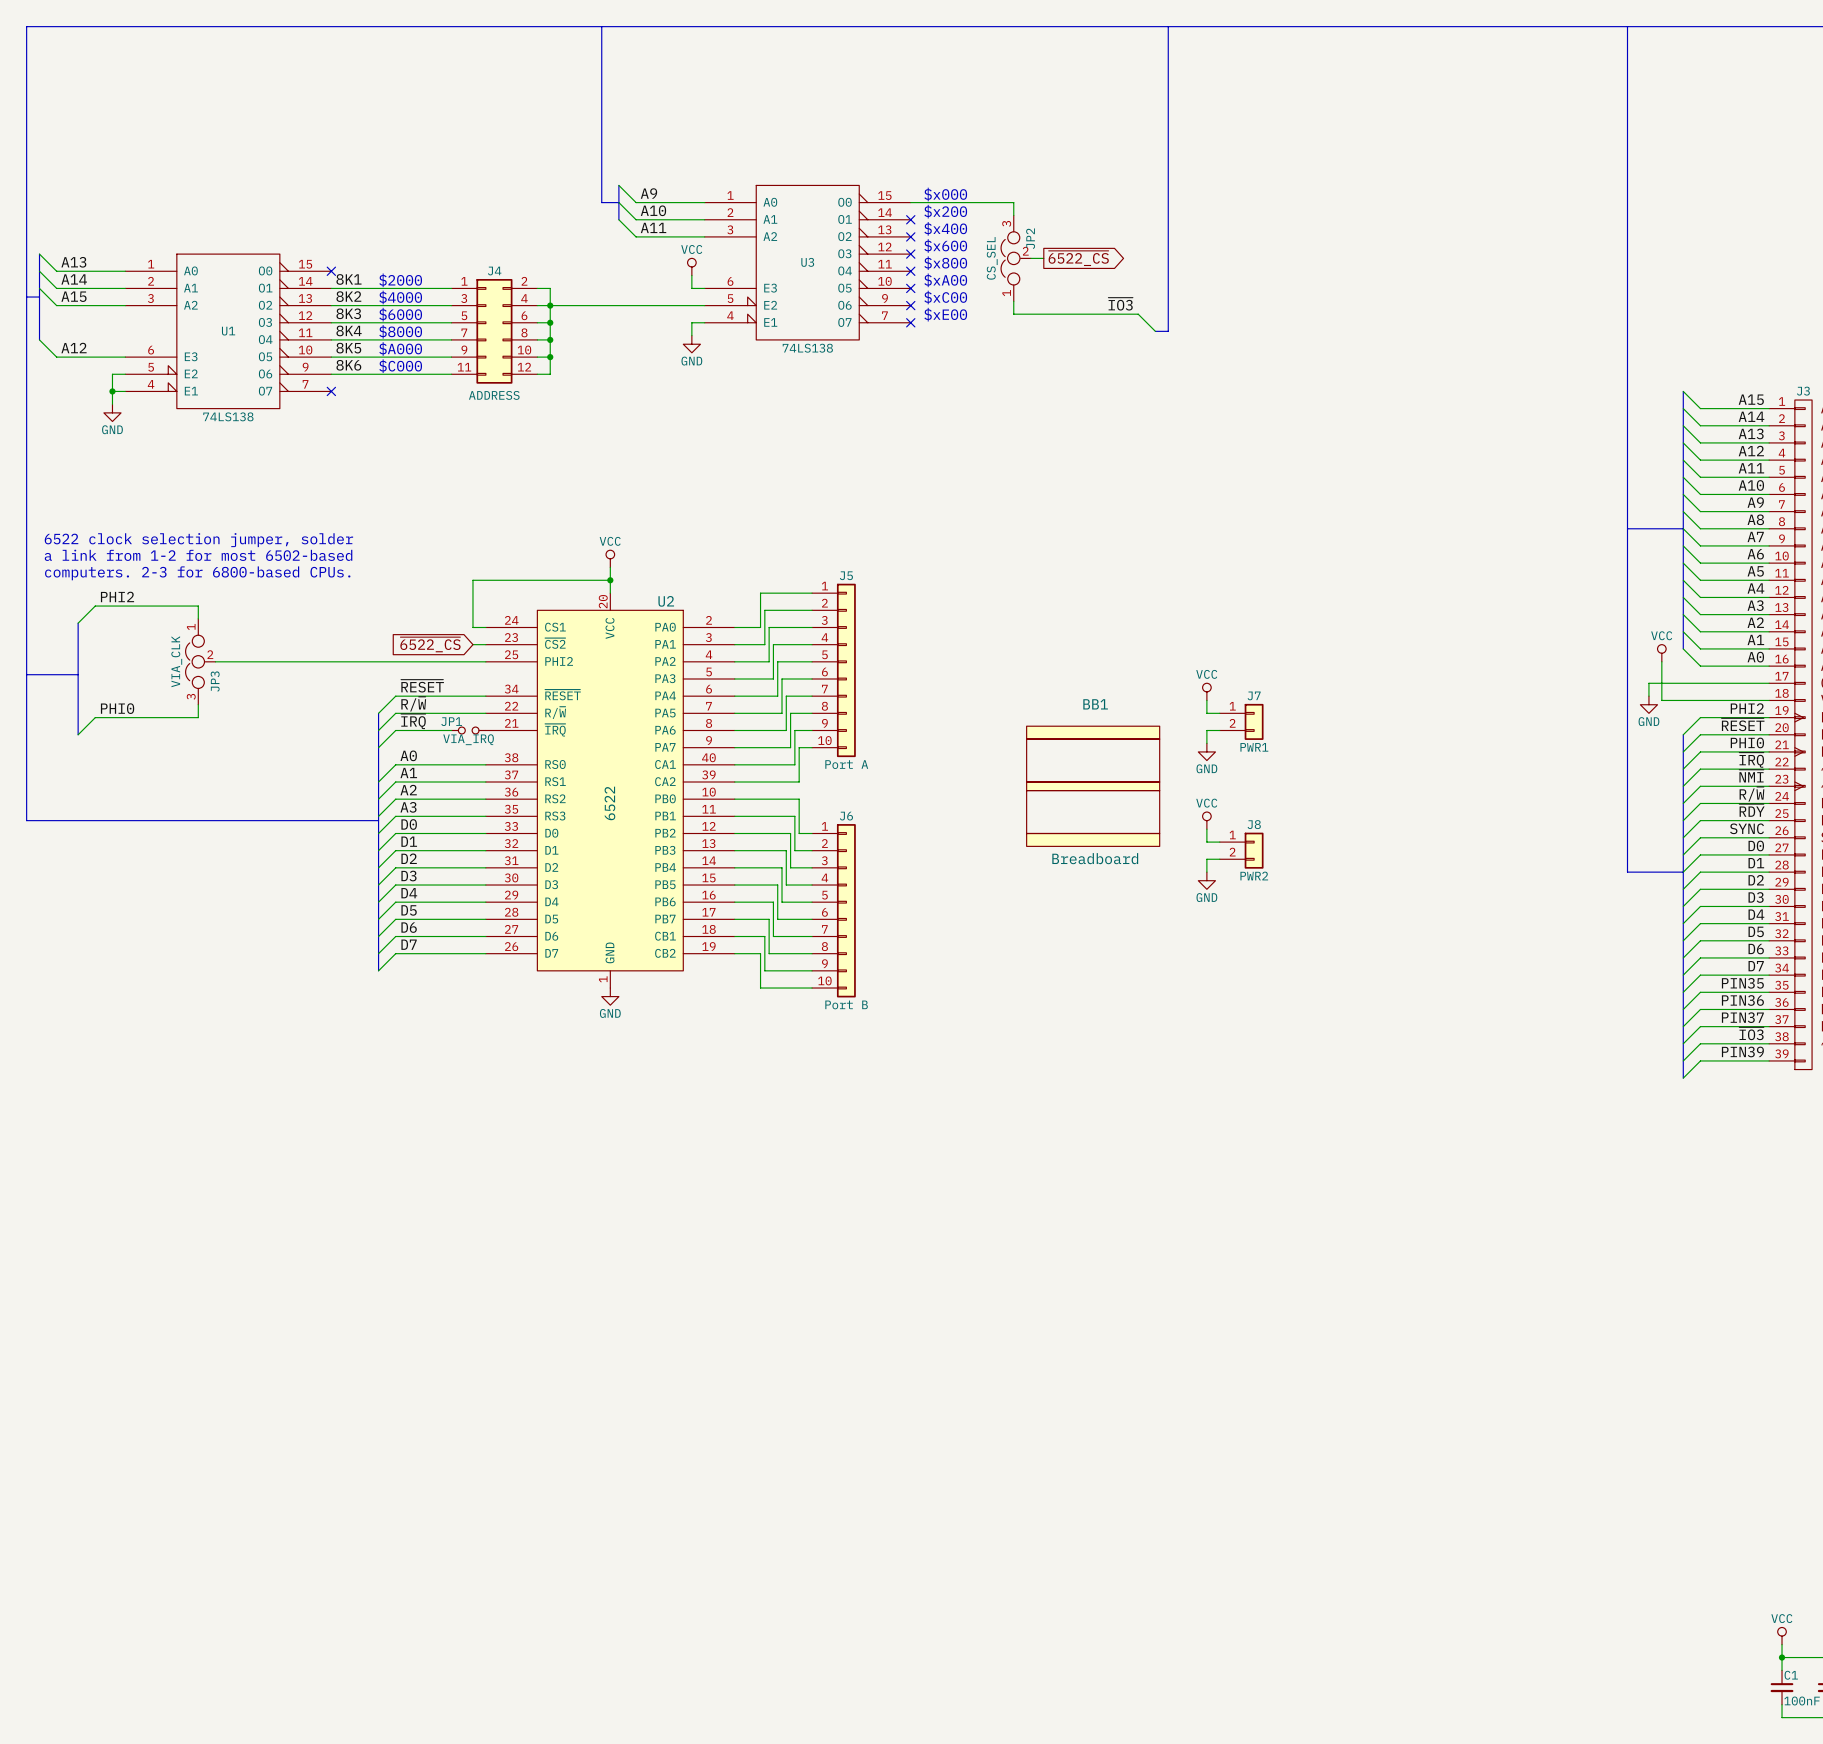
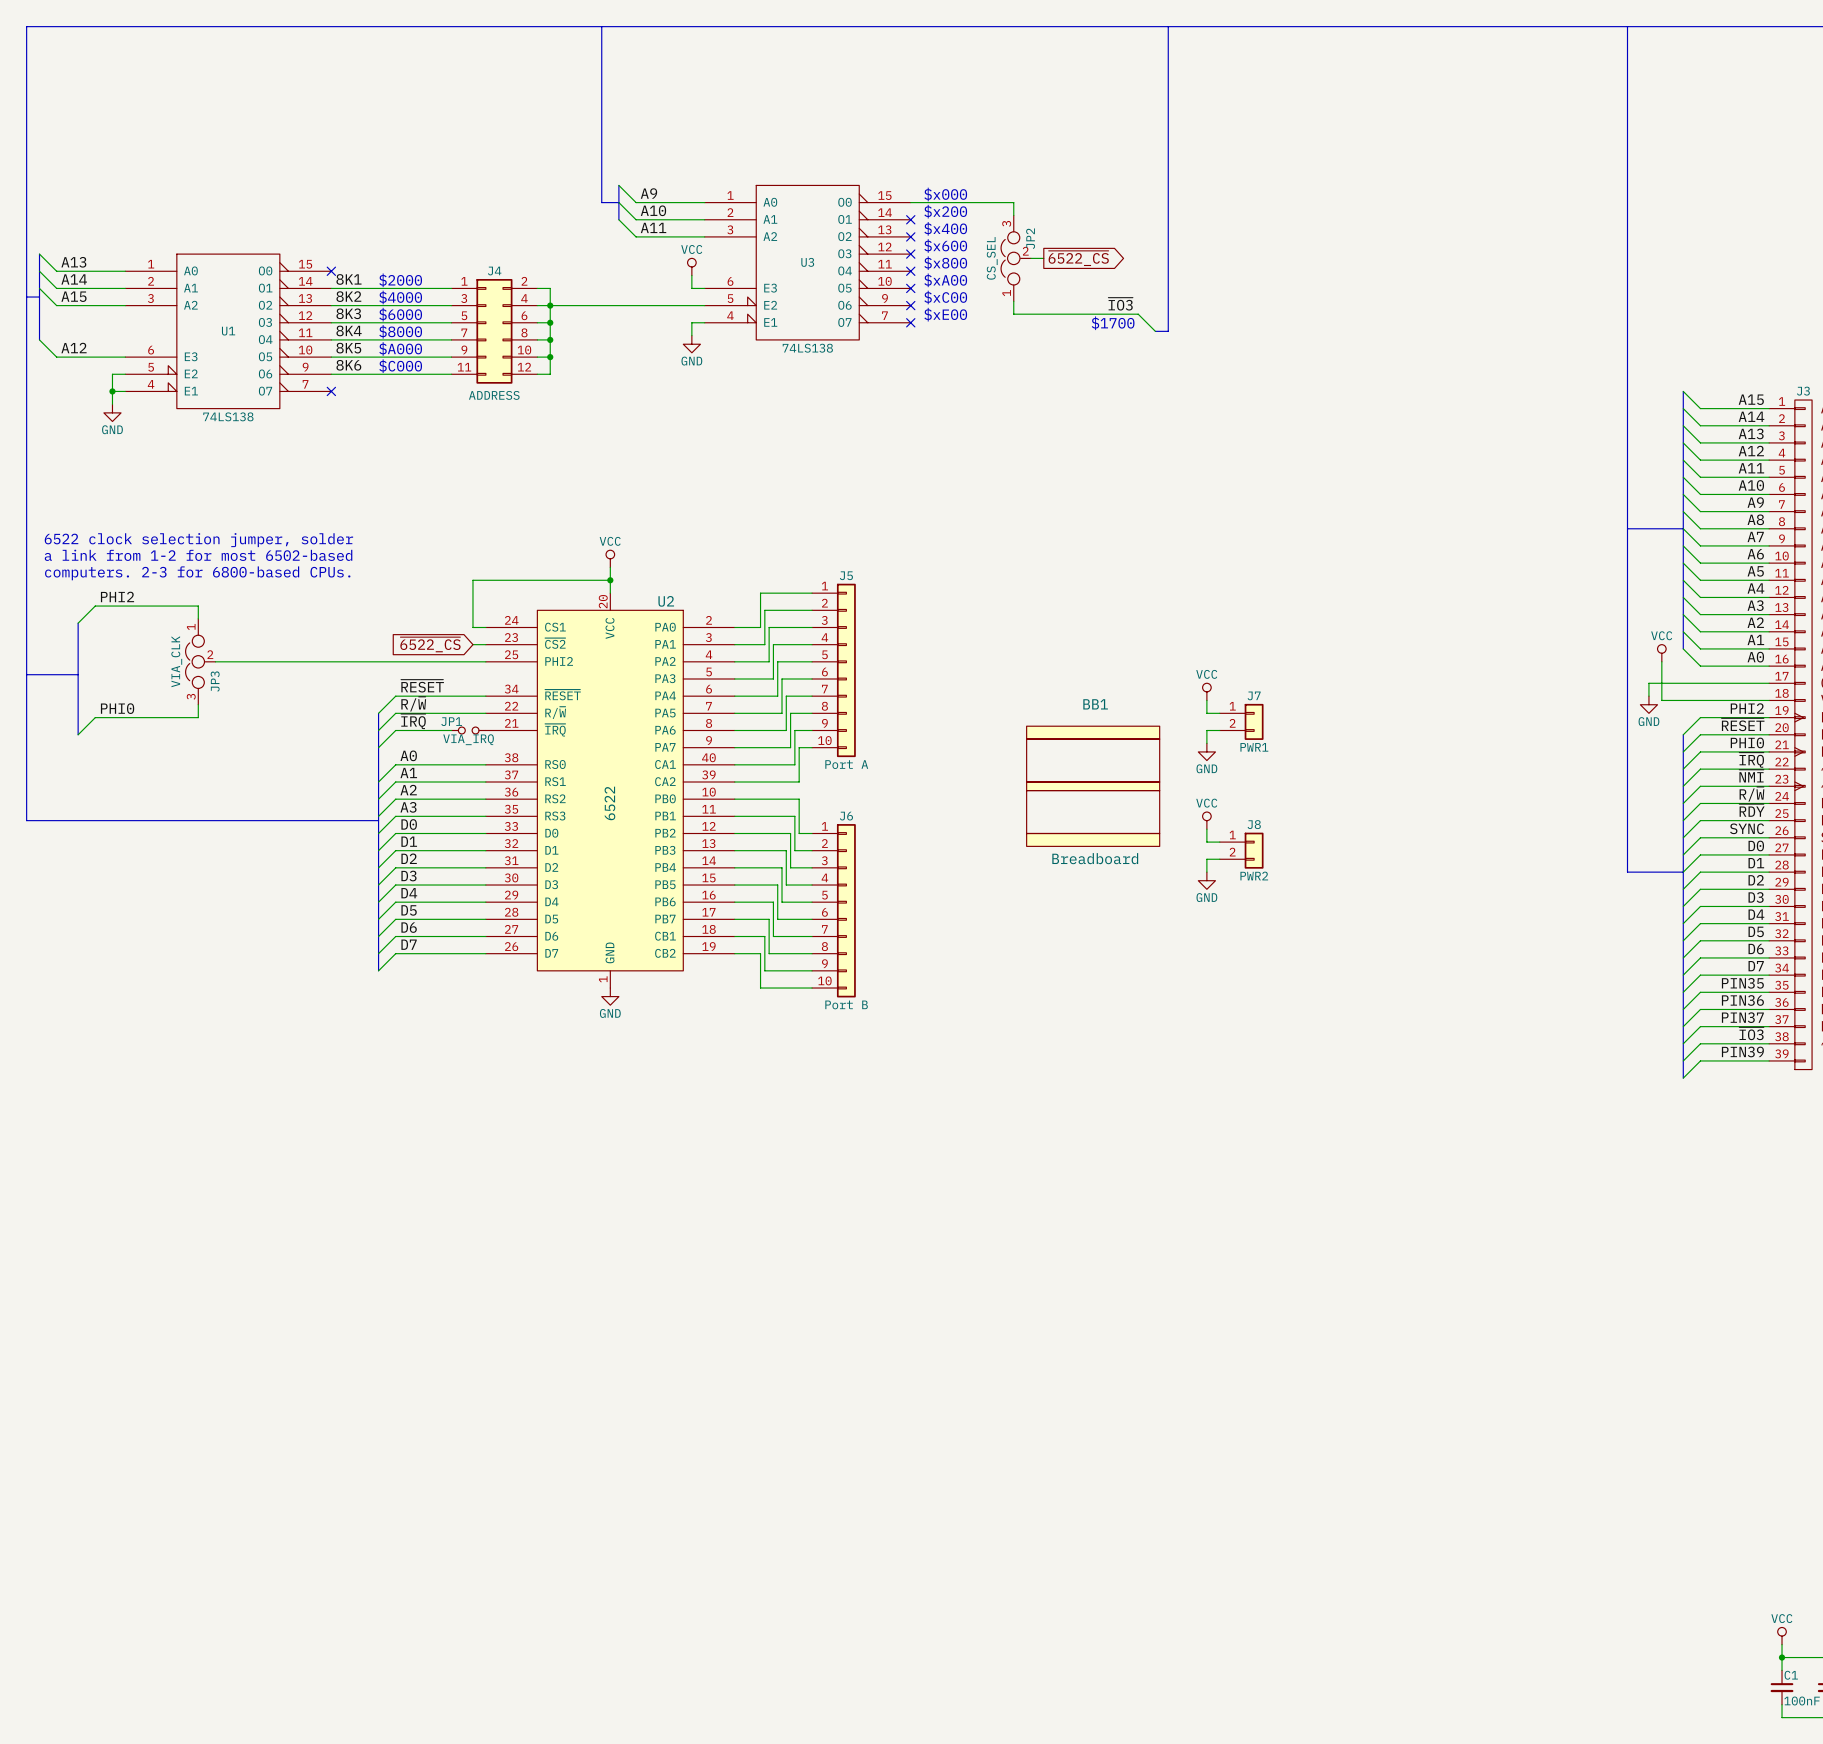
text: none -> $1700 (1113, 323)

